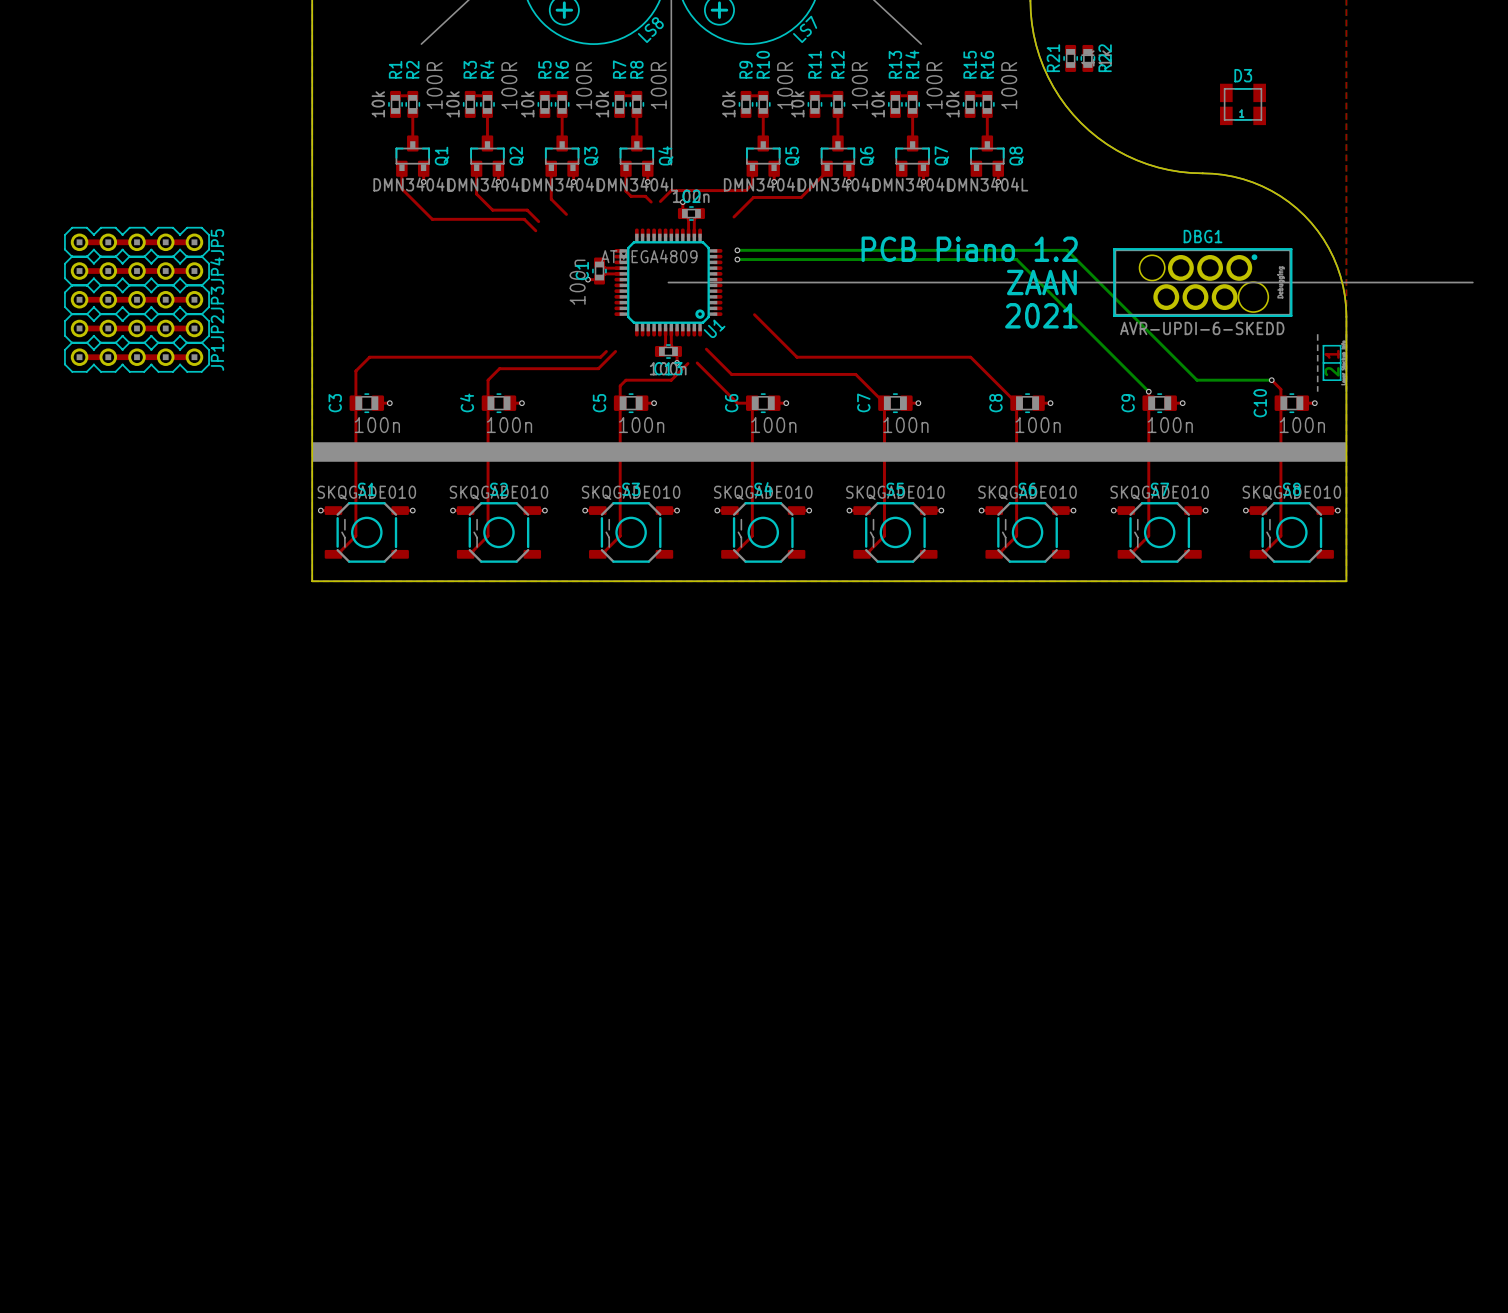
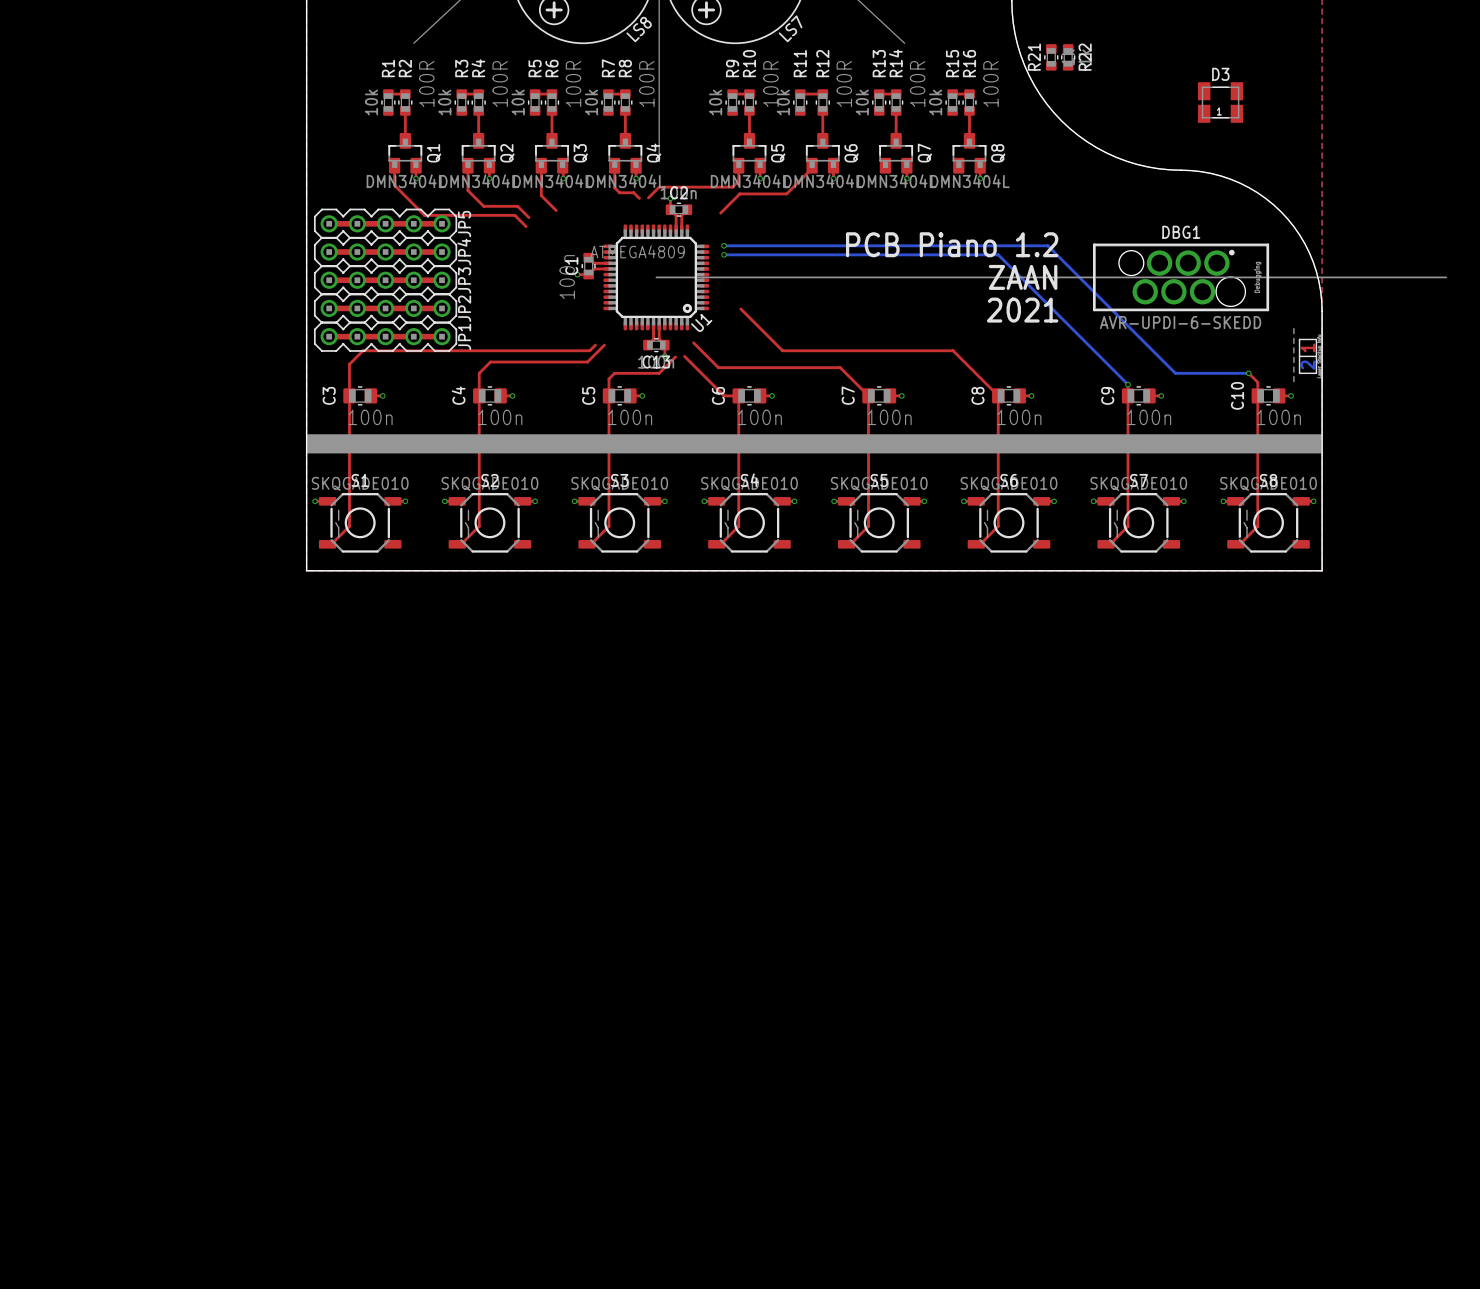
JP5 position: (137, 242) -> (385, 223)
JP4 position: (137, 271) -> (385, 252)
JP3 position: (137, 299) -> (385, 280)
JP2 position: (137, 328) -> (385, 308)
JP1 position: (137, 357) -> (385, 336)

